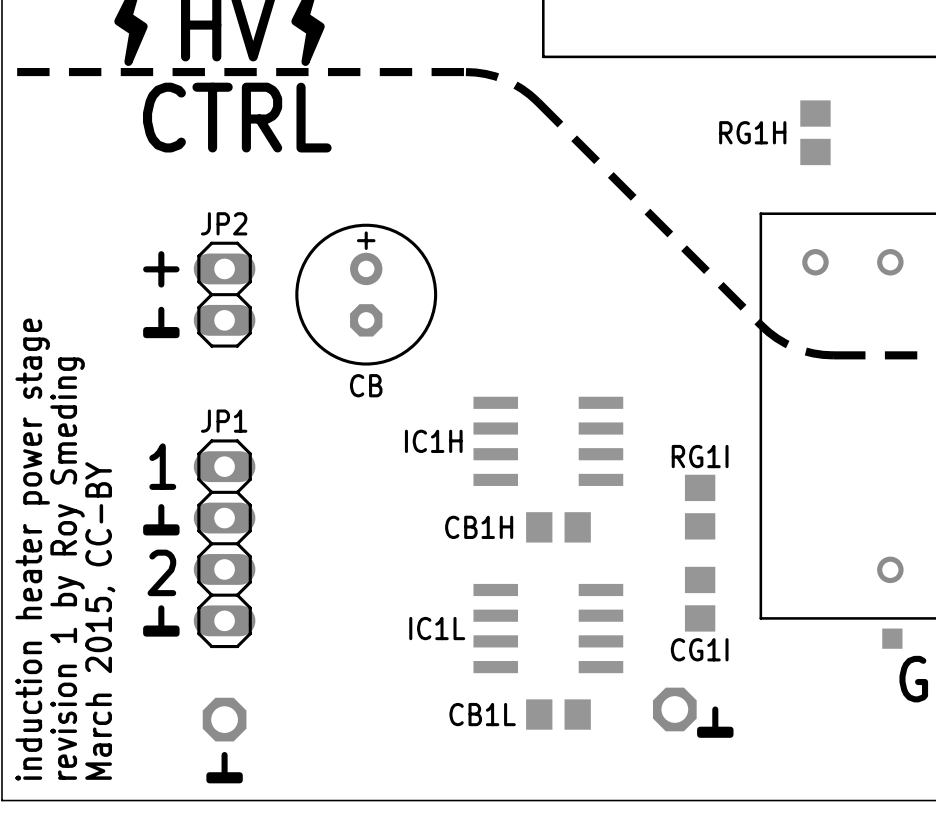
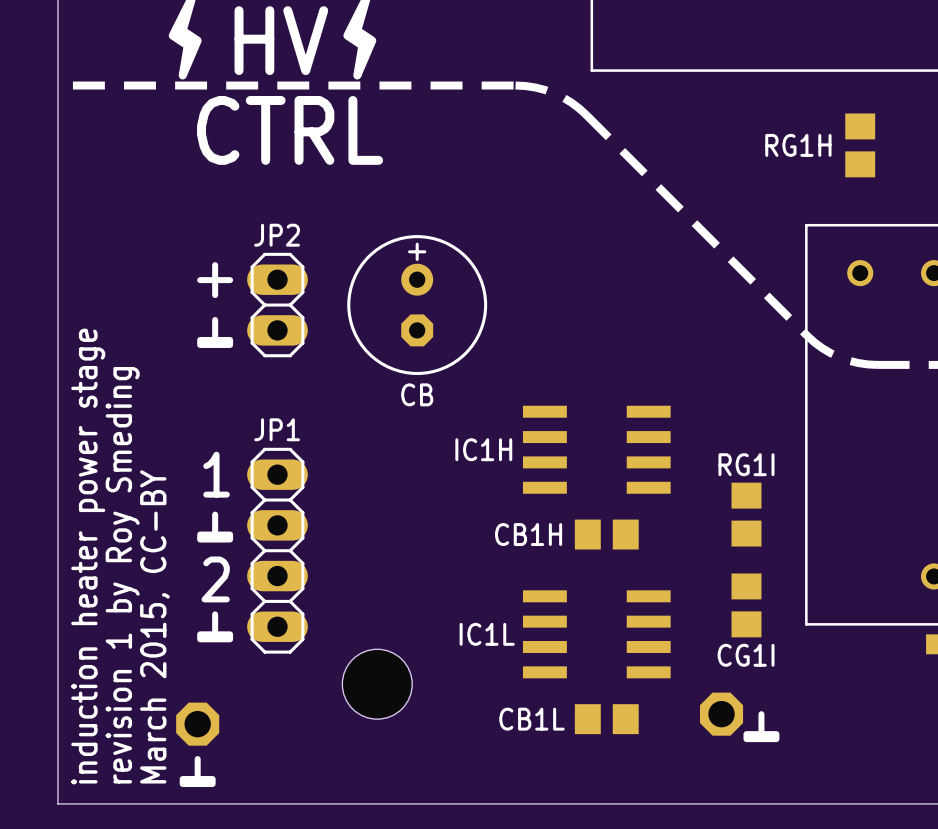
hole: none -> (377, 684)
part position: (224, 719) -> (197, 724)
line: (224, 755) (224, 775) -> (197, 759) (197, 779)
drawing position: (224, 777) -> (197, 781)

